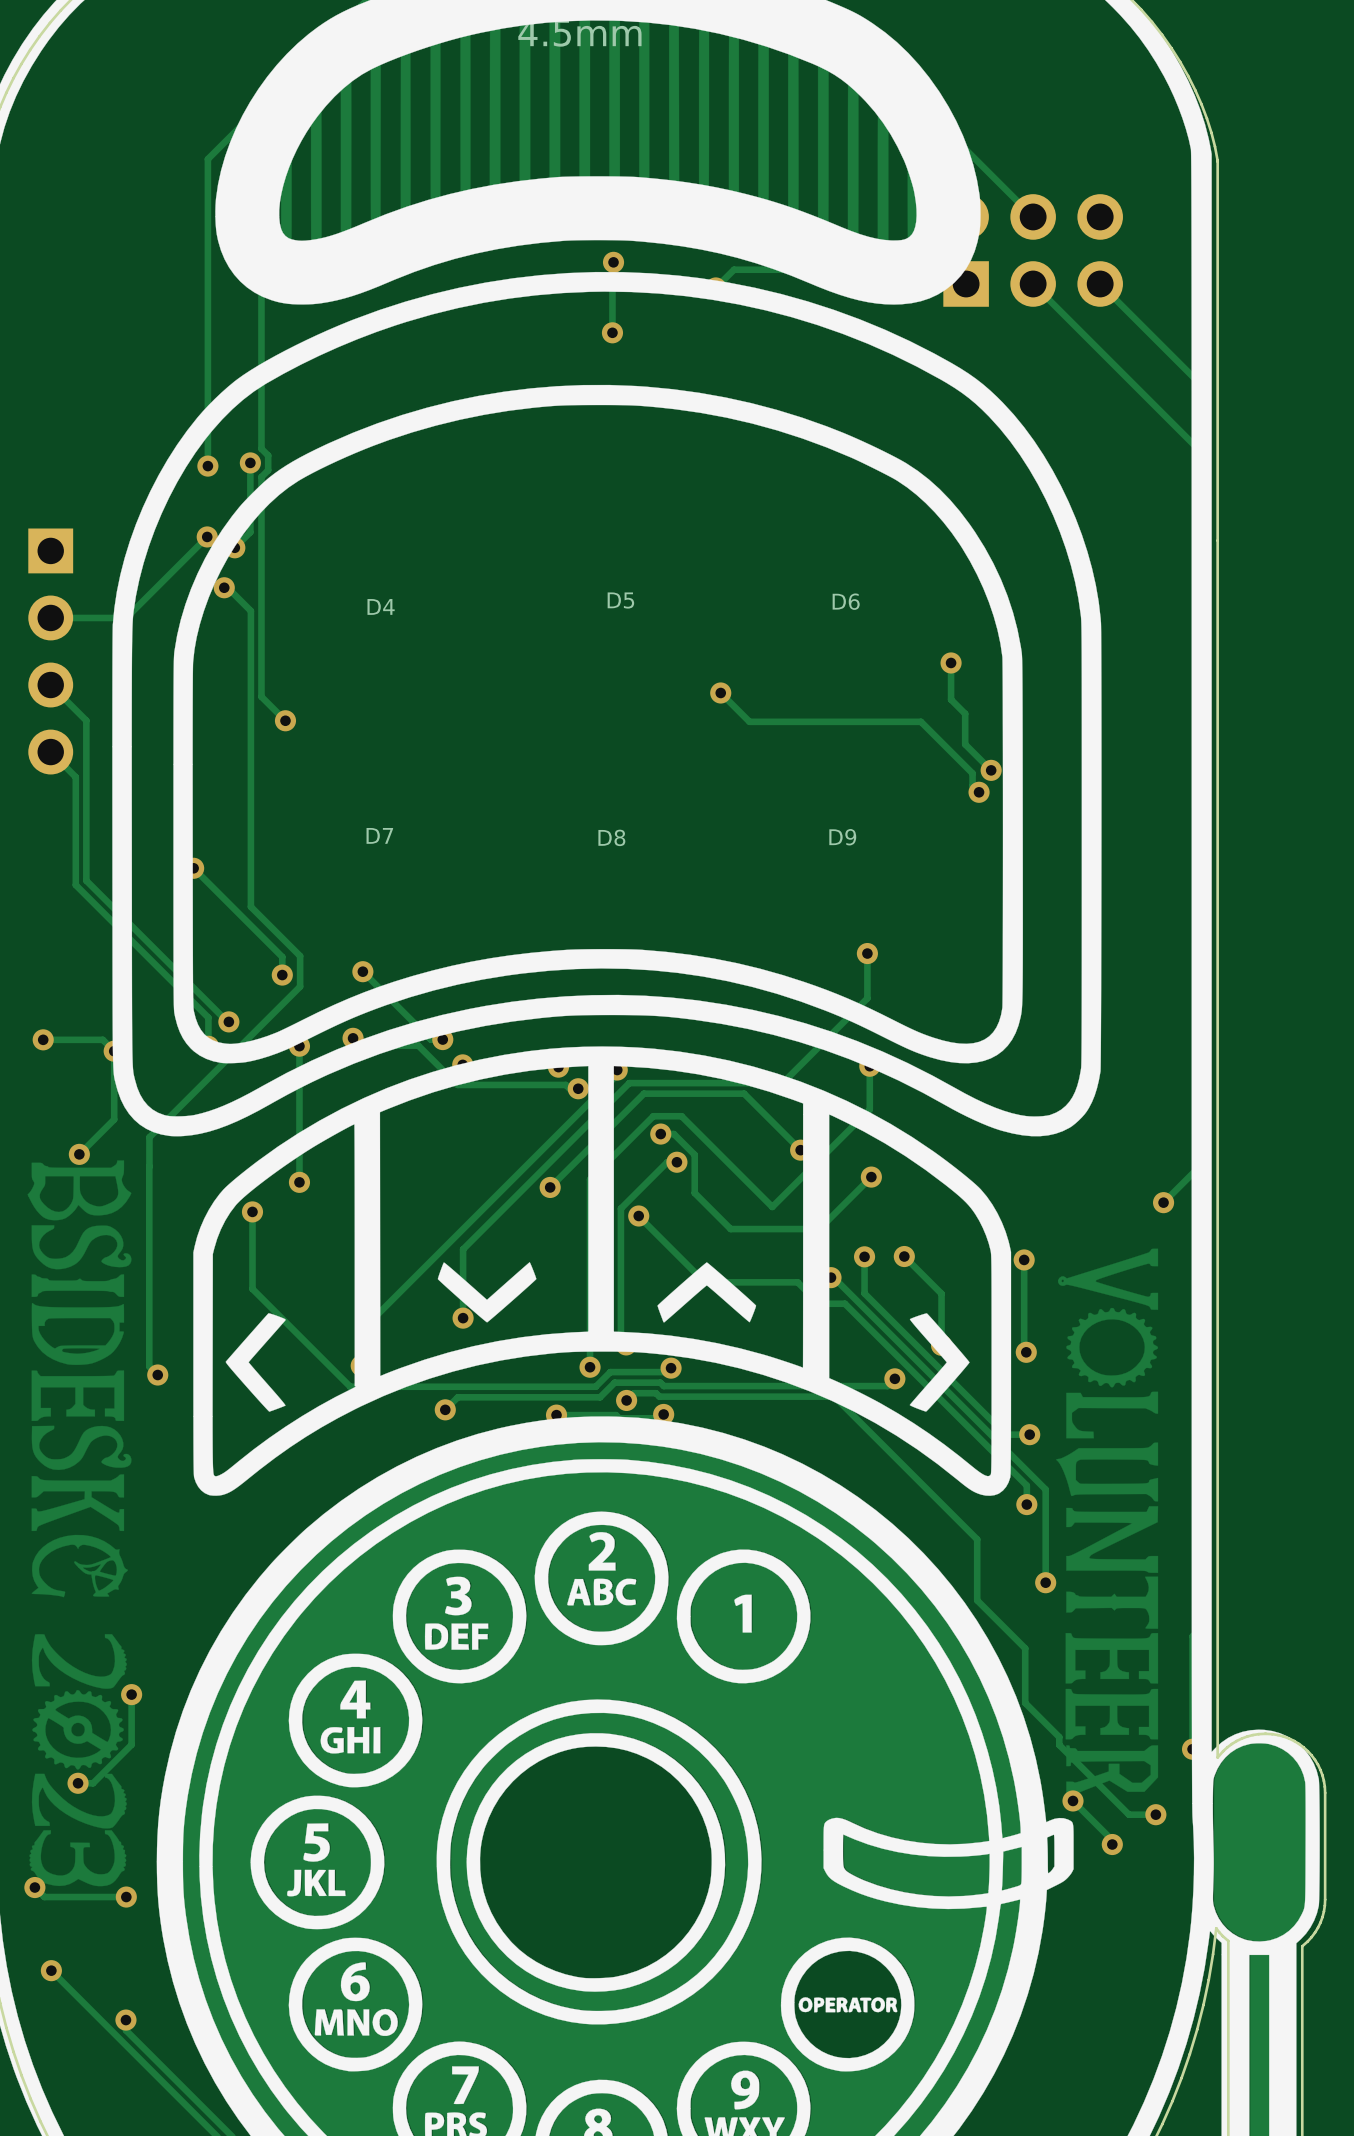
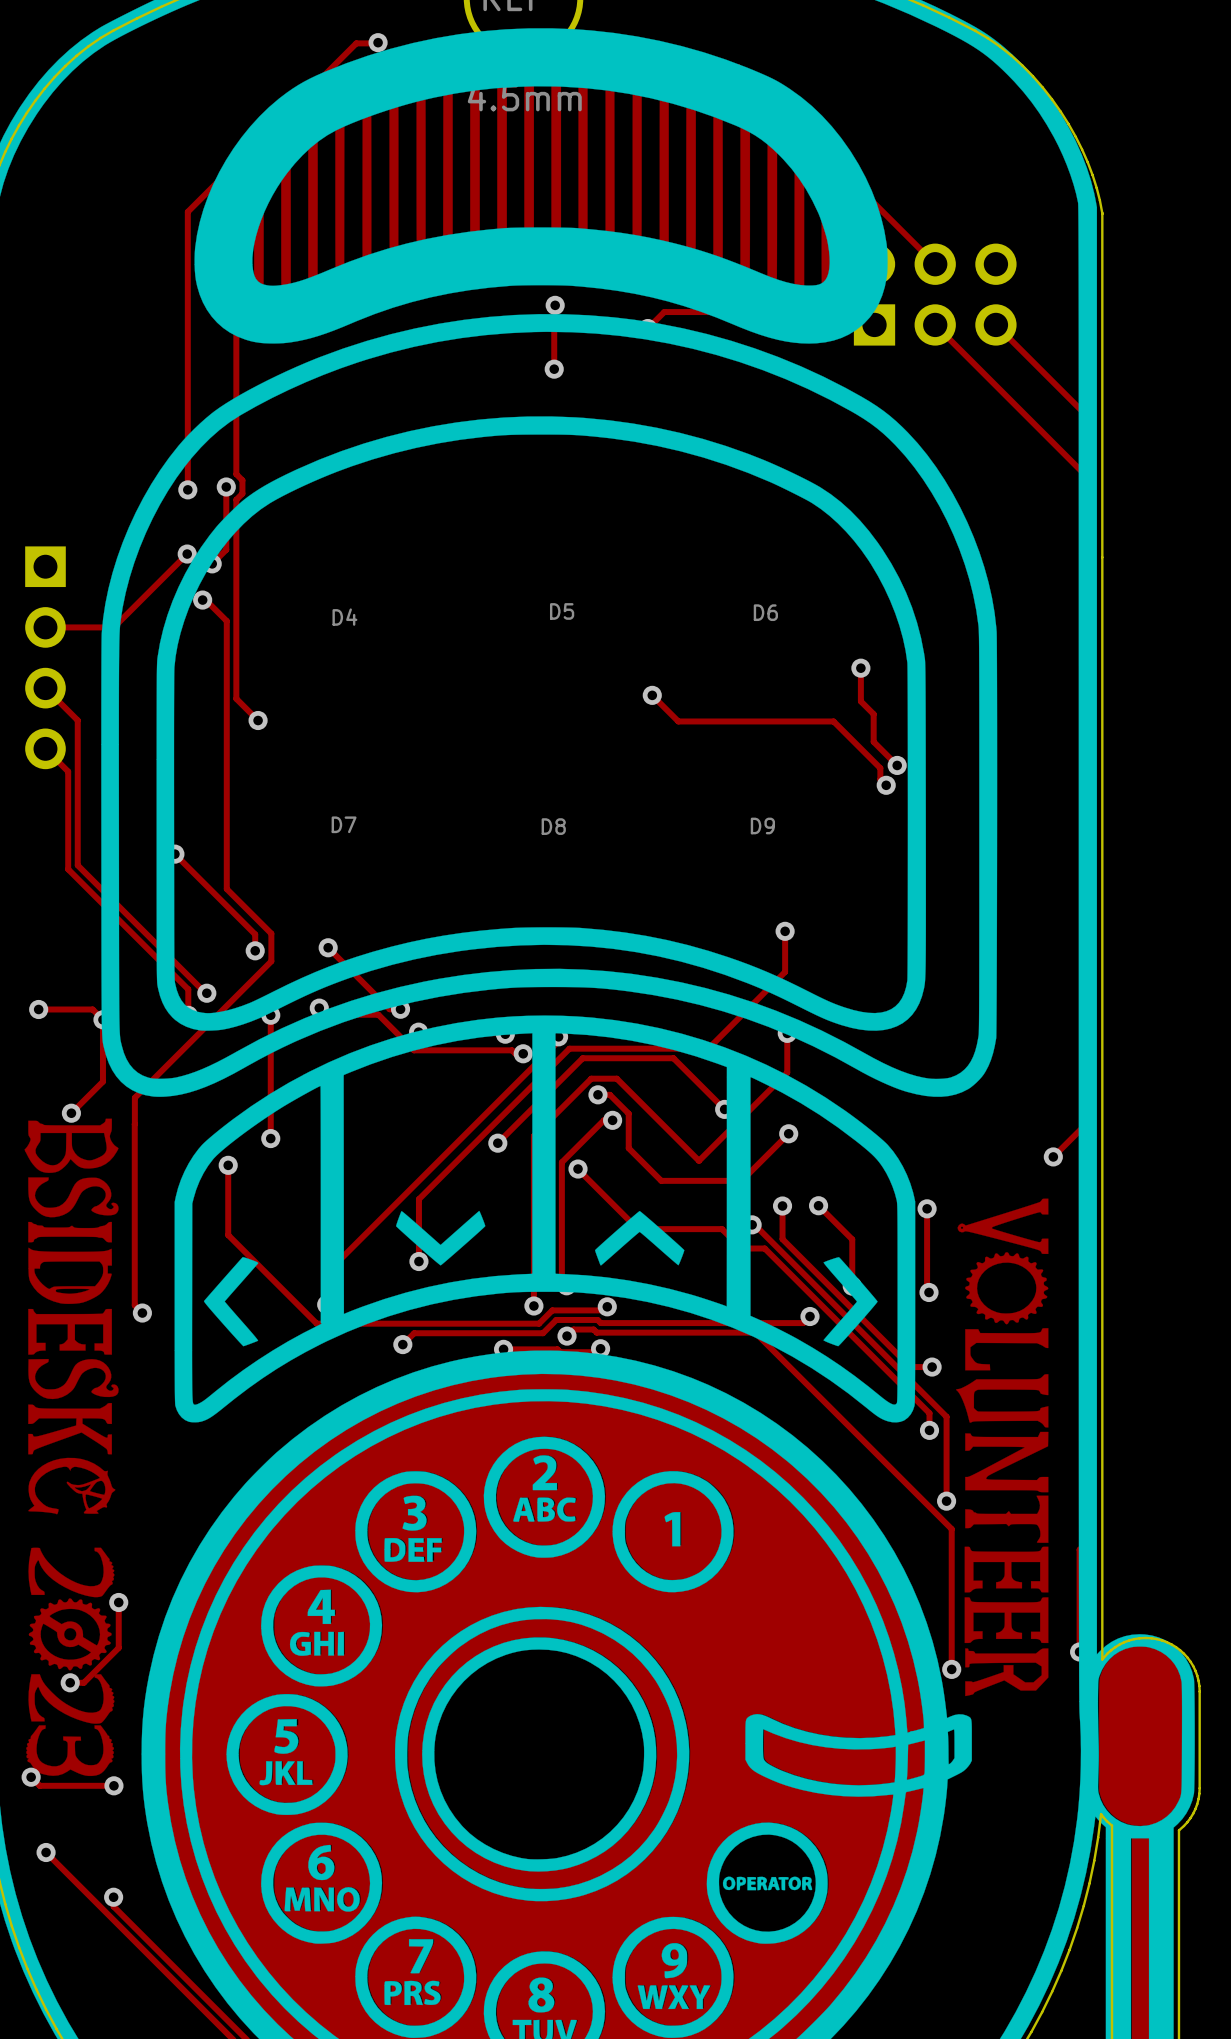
track: (977, 1539) (977, 1600) (1025, 1648) (1025, 1703) (1059, 1737) (1059, 1745) (1128, 1814) (1155, 1814) -> (884, 1461) (951, 1529) (951, 1669)
track: (1073, 1800) (1112, 1840) (1112, 1844) -> none
via position: (1073, 1800) -> (951, 1669)
via: (1155, 1814) -> none
via: (1112, 1844) -> none

